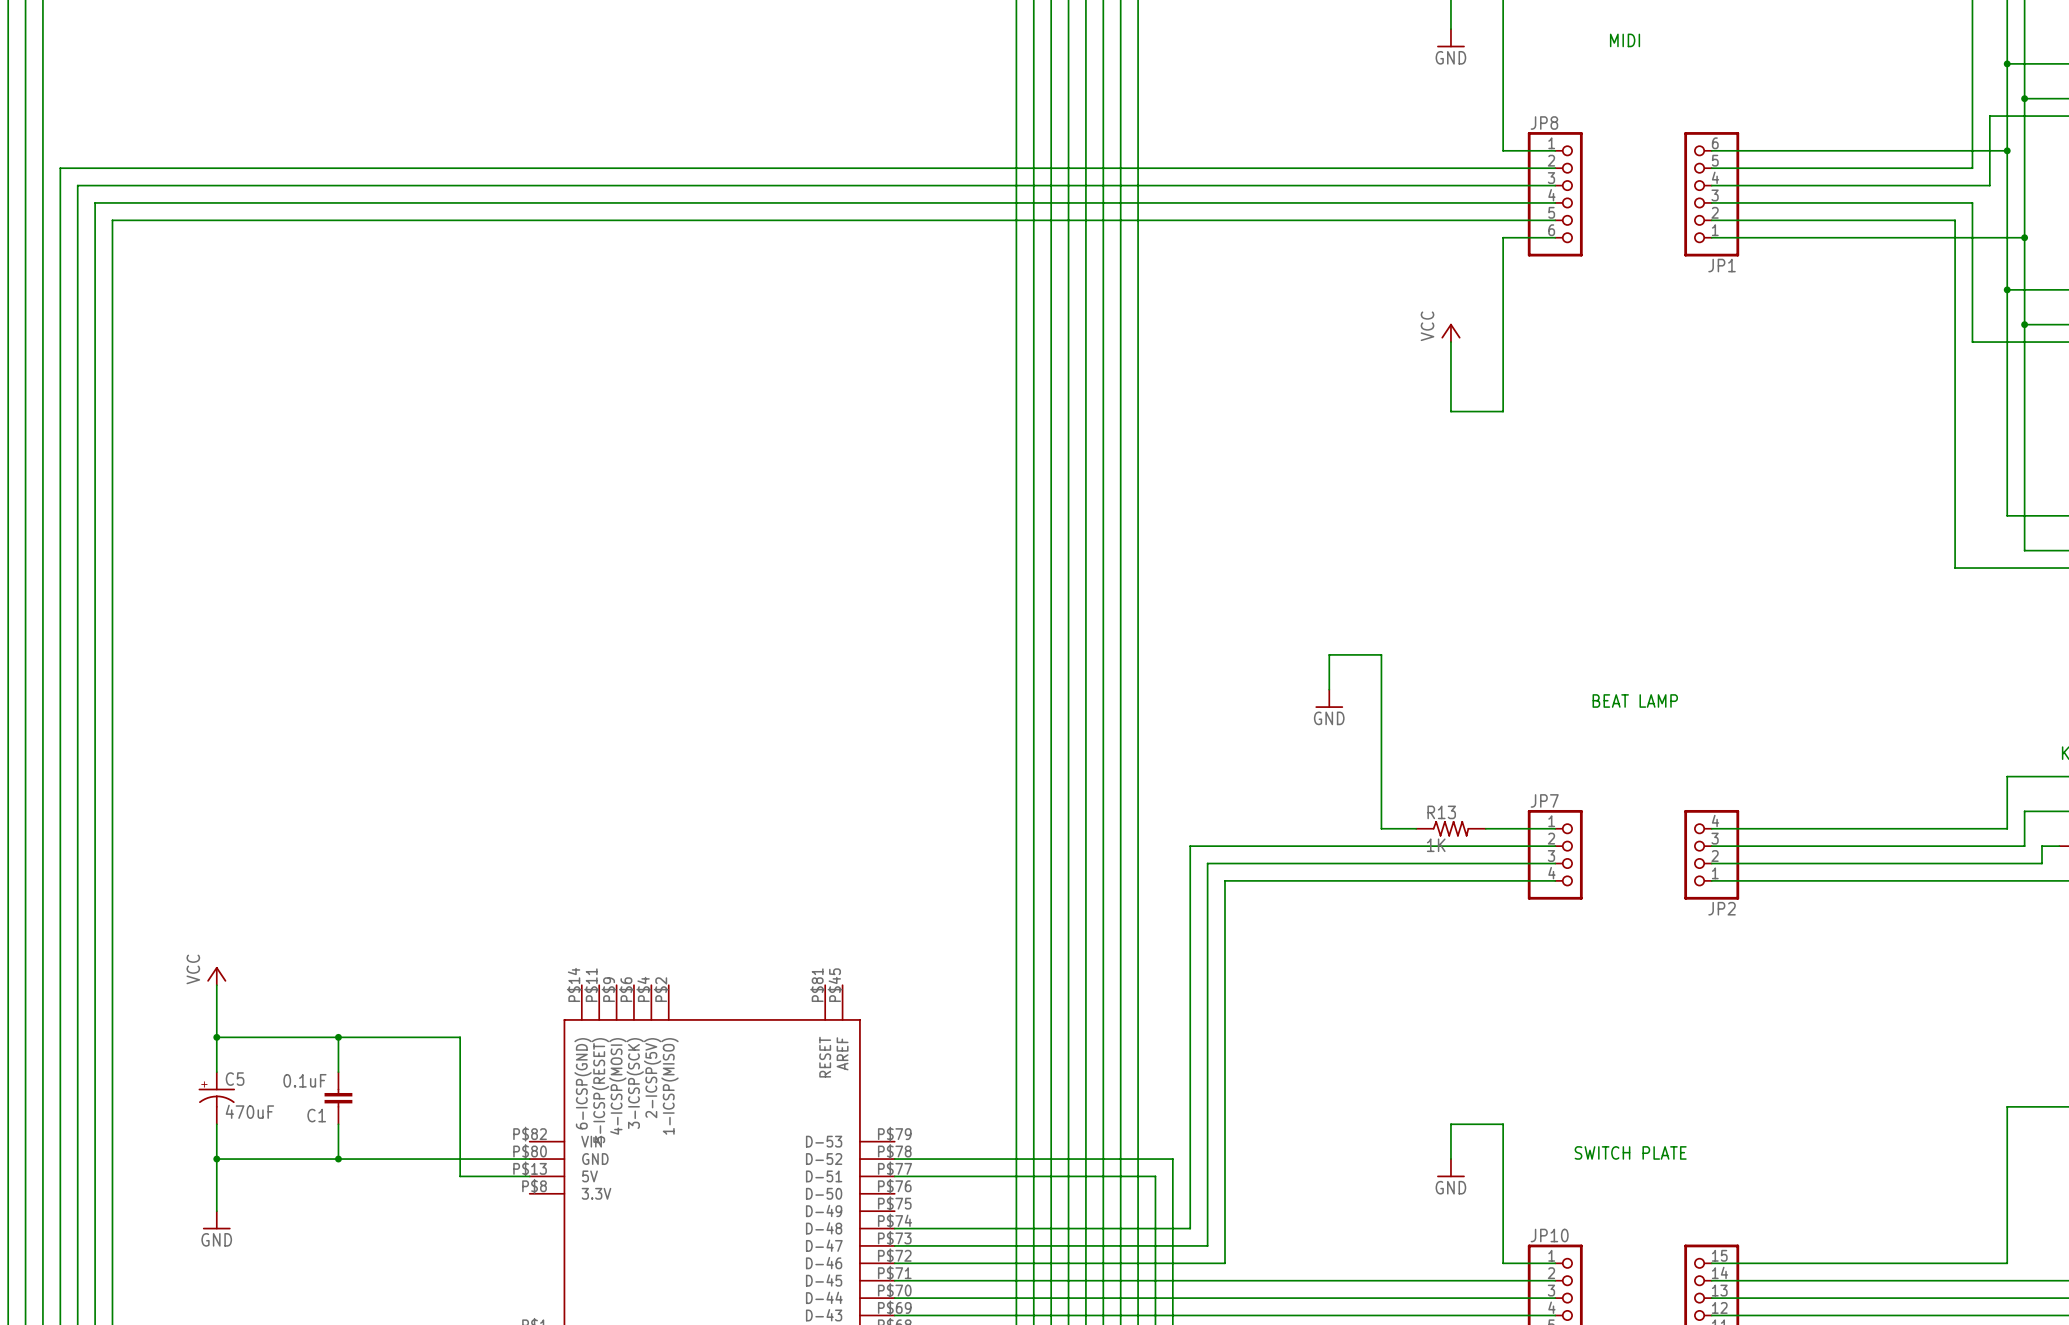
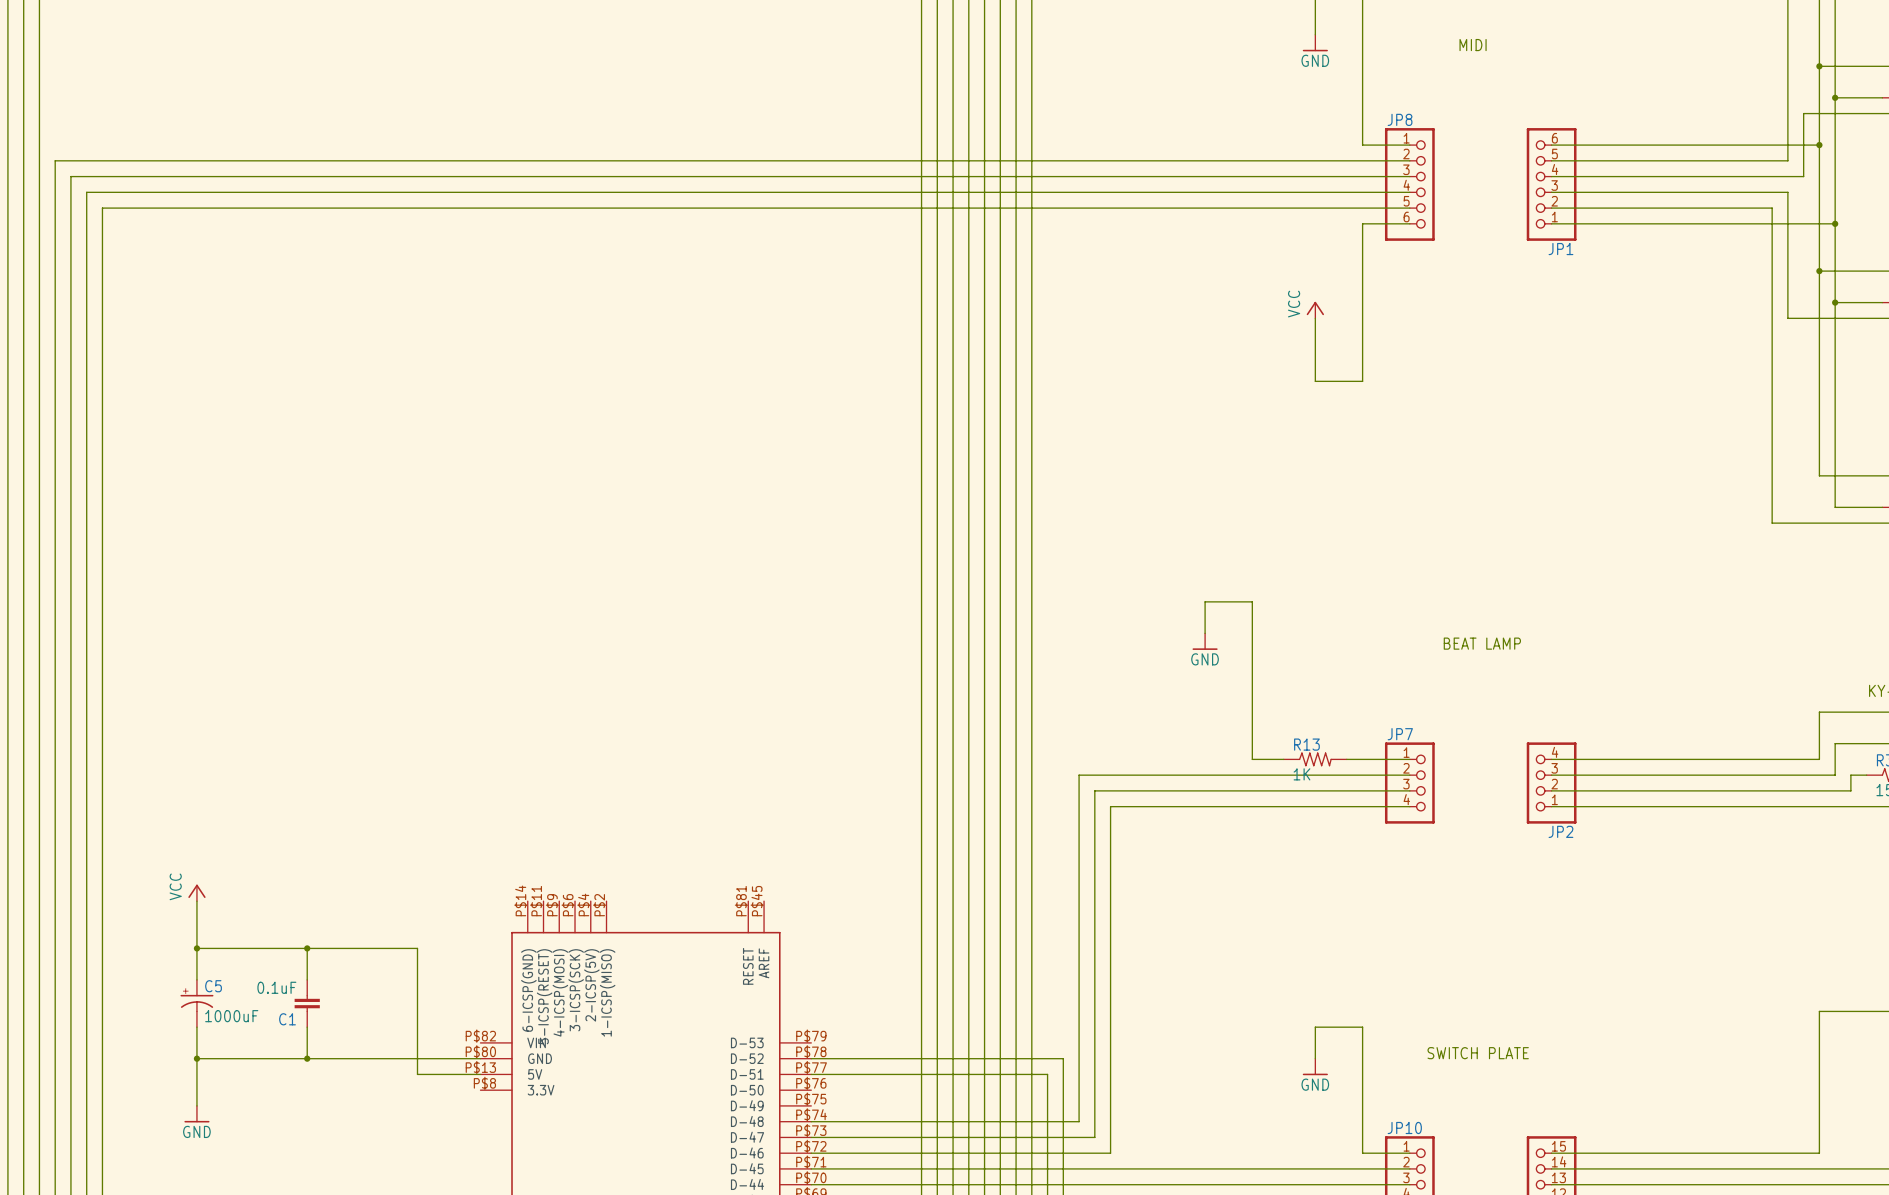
C5 value: 470uF (249, 1111) -> 1000uF (231, 1016)

